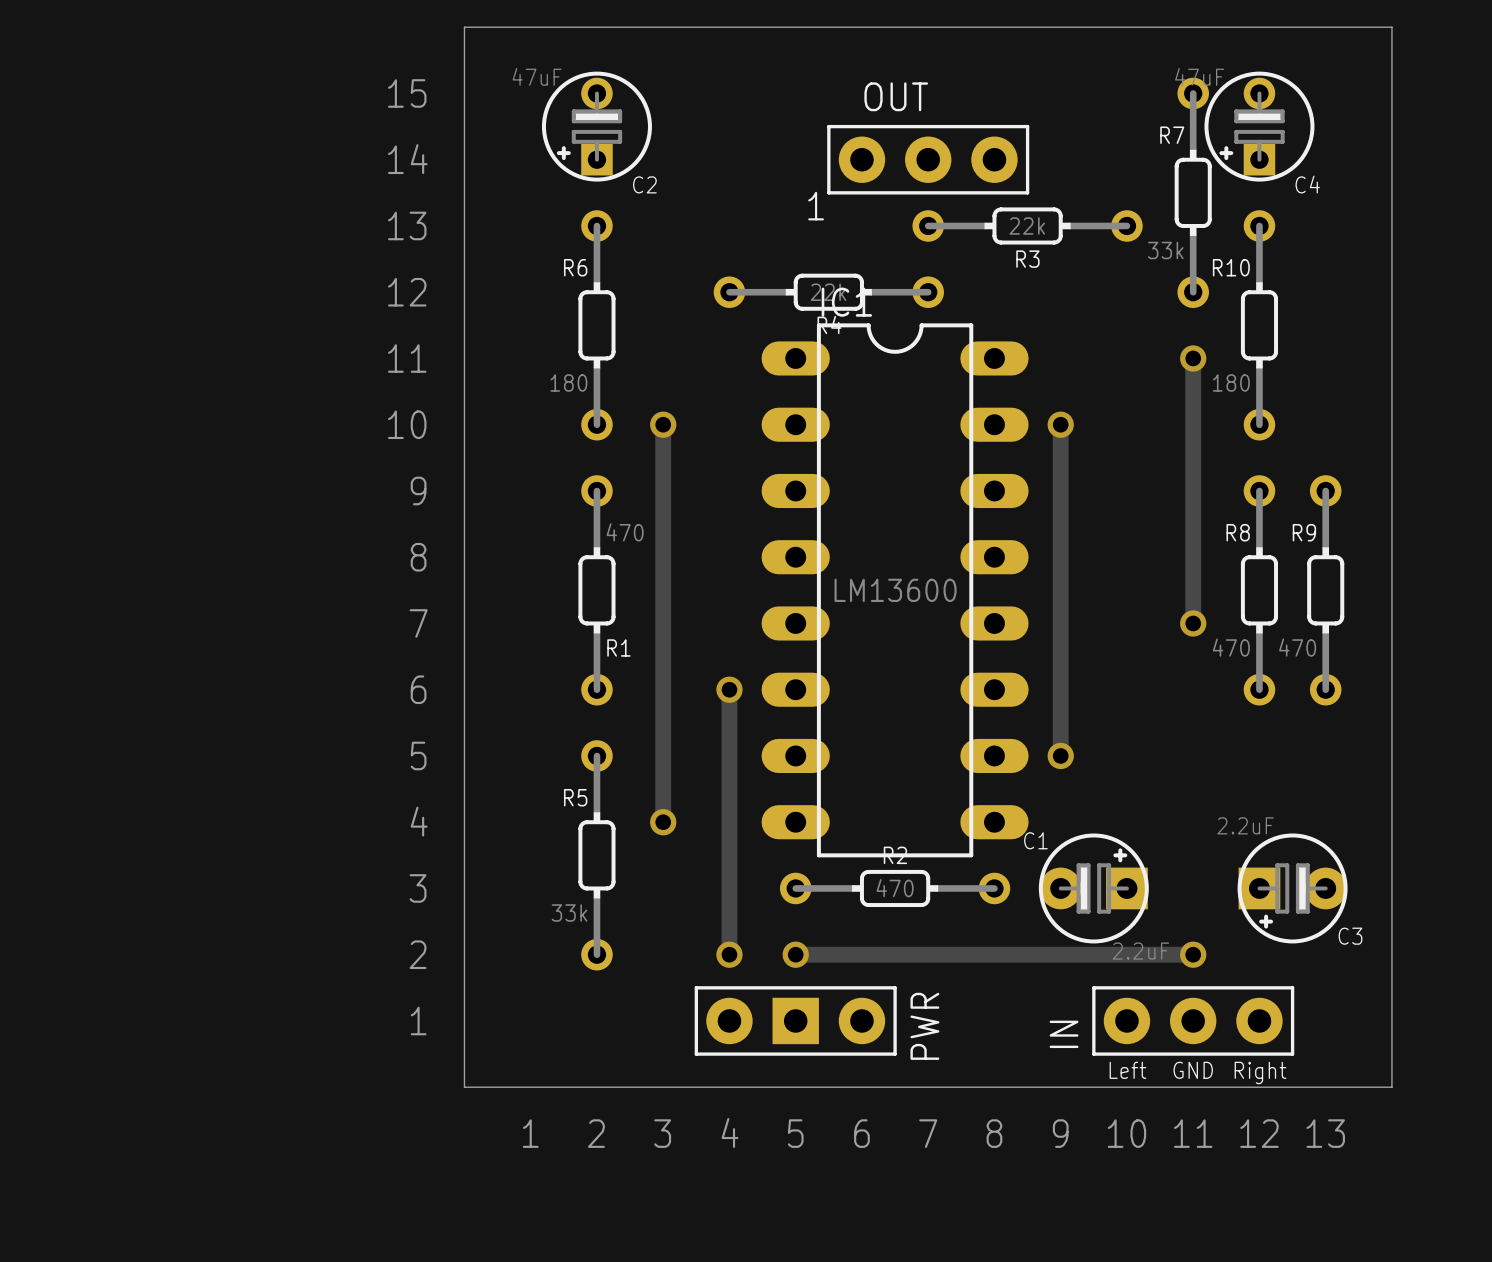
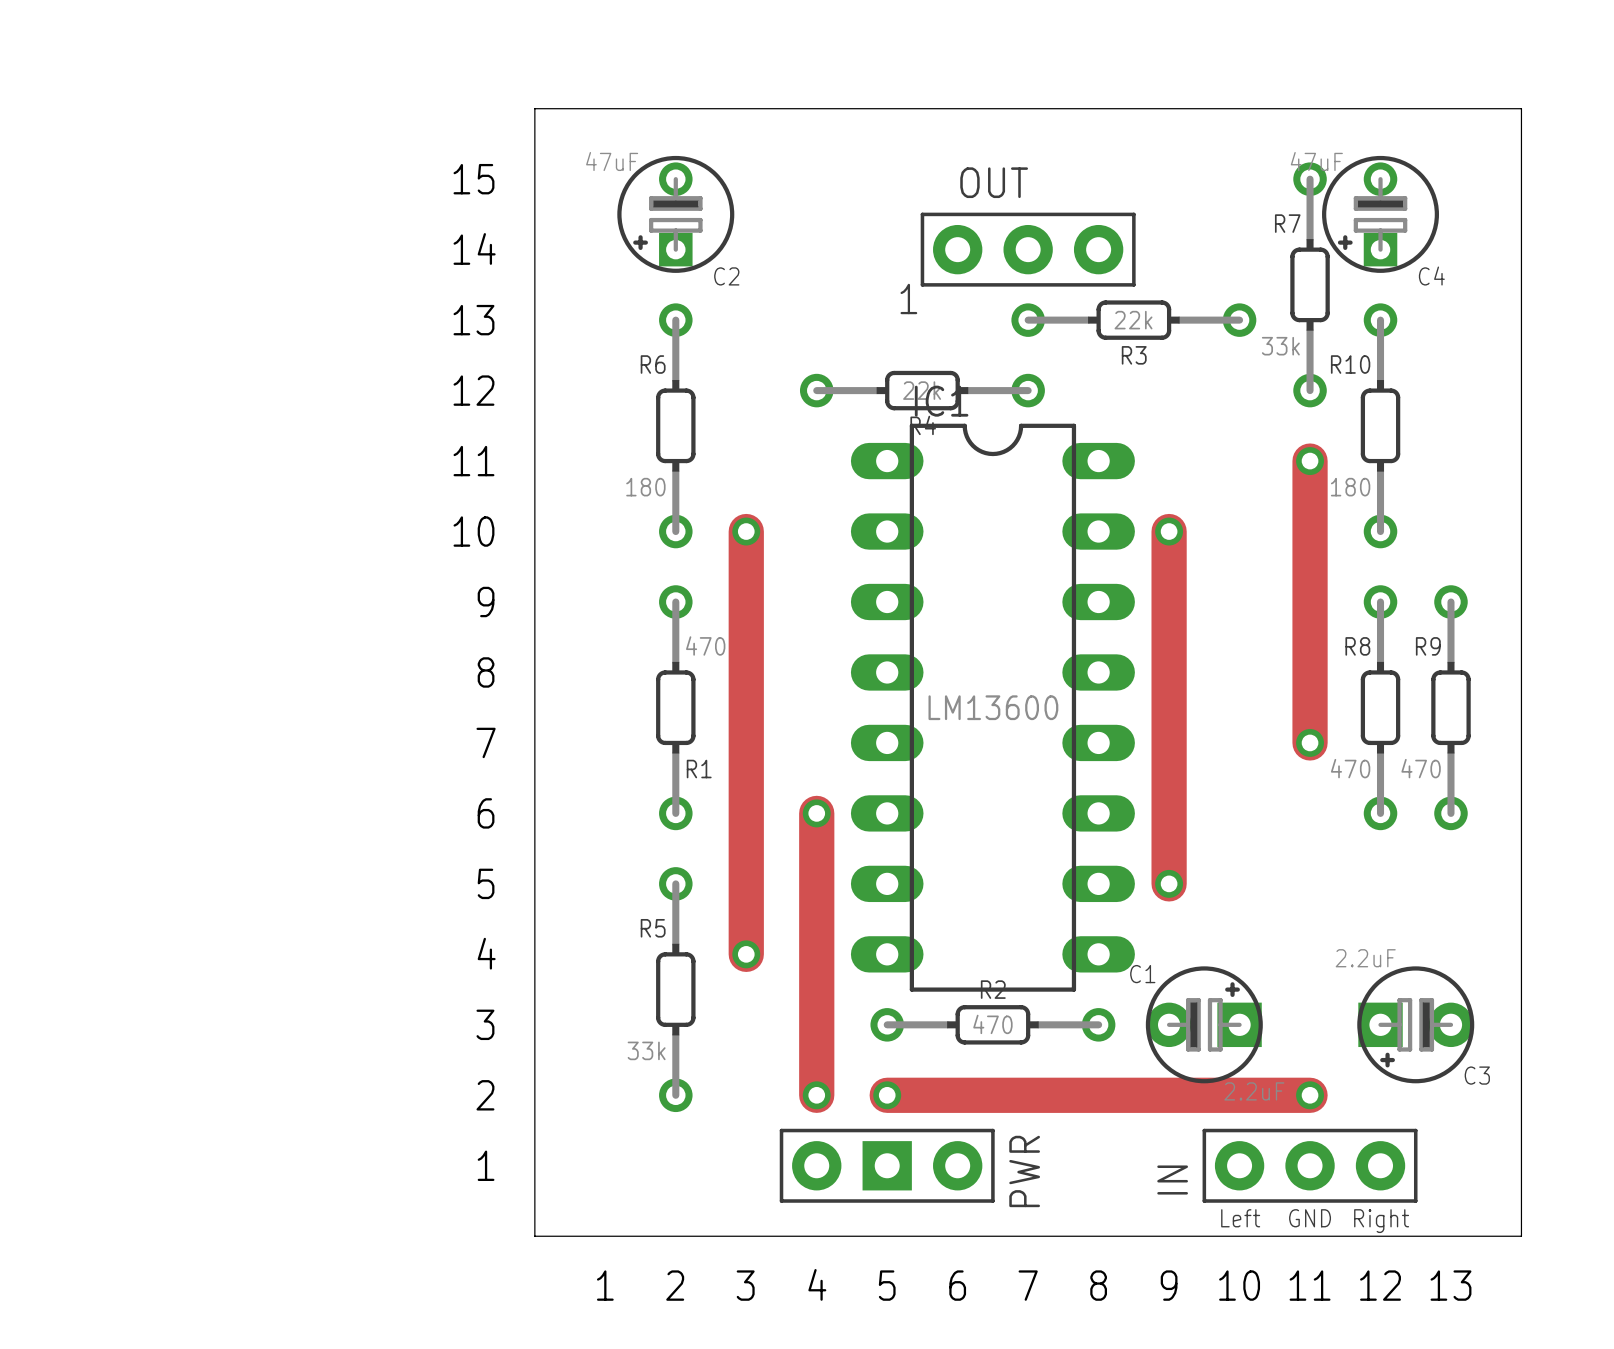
track width: thin (1193, 358) (1193, 623) -> thick (1310, 461) (1310, 742)
track width: thin (663, 424) (663, 822) -> thick (746, 531) (746, 954)
track width: thin (1060, 424) (1060, 755) -> thick (1169, 531) (1169, 883)
track width: thin (729, 689) (729, 954) -> thick (816, 813) (816, 1095)
track width: thin (795, 954) (1193, 954) -> thick (887, 1095) (1310, 1095)

